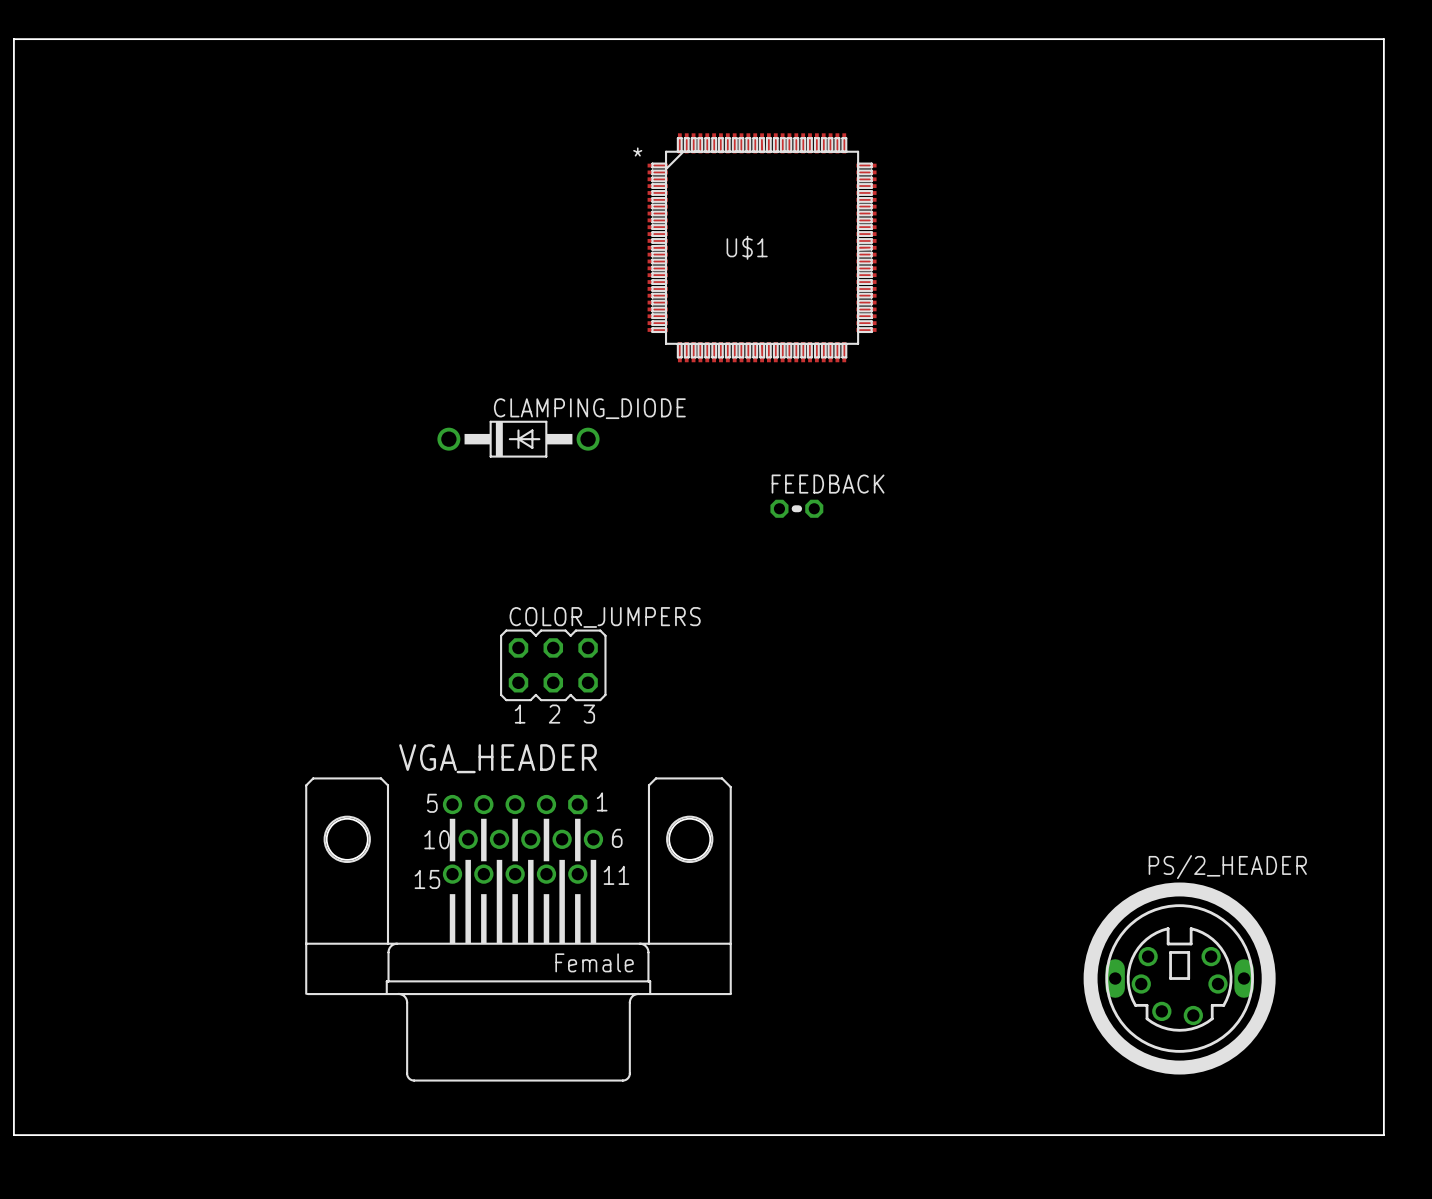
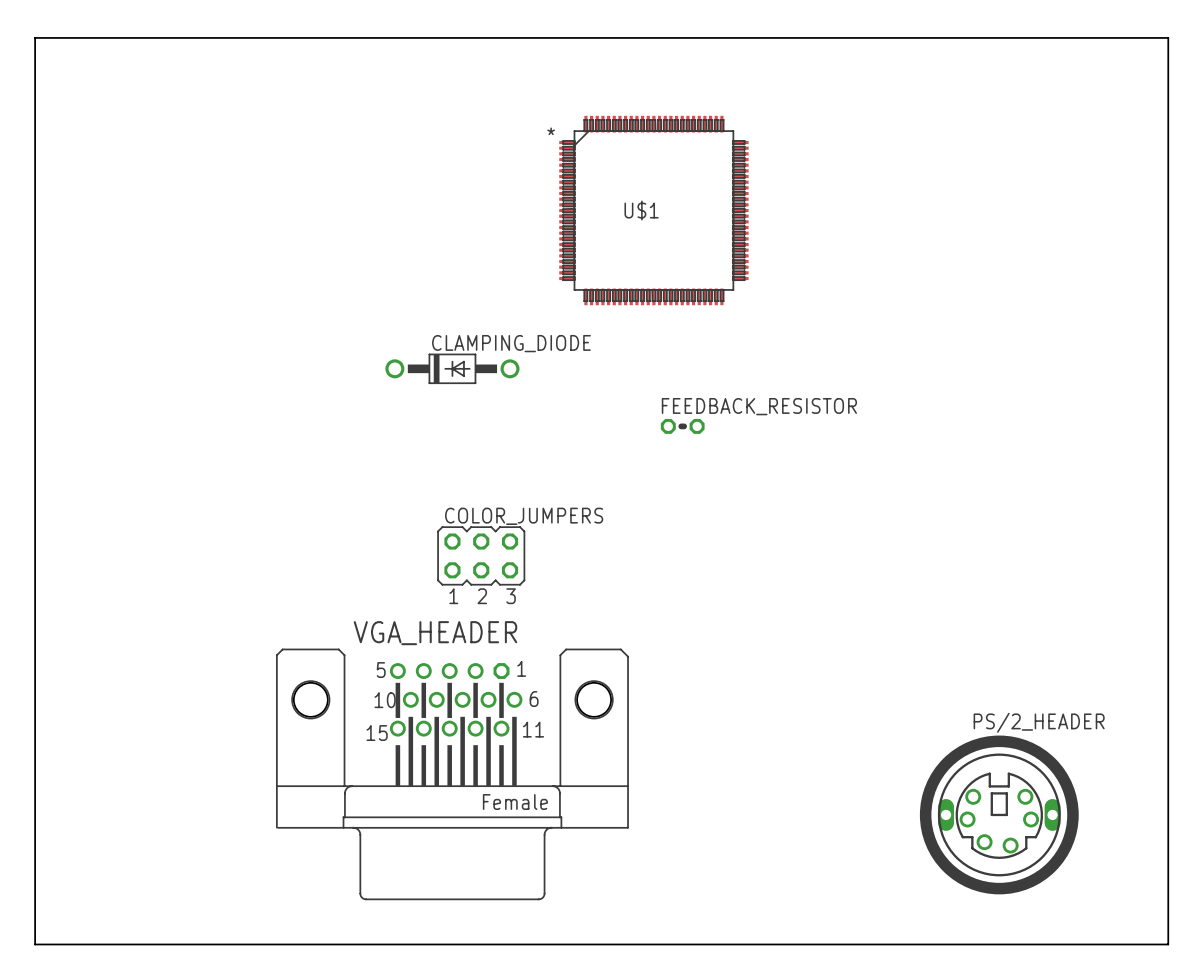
FEEDBACK name: FEEDBACK (828, 484) -> FEEDBACK_RESISTOR (759, 406)

